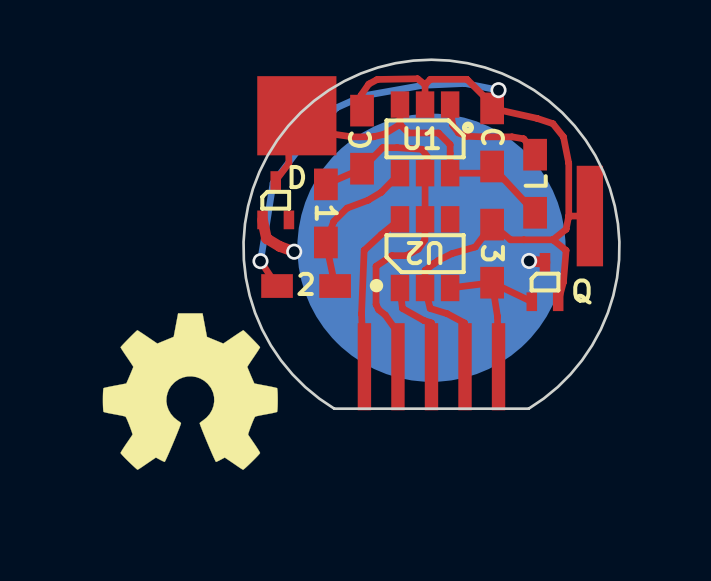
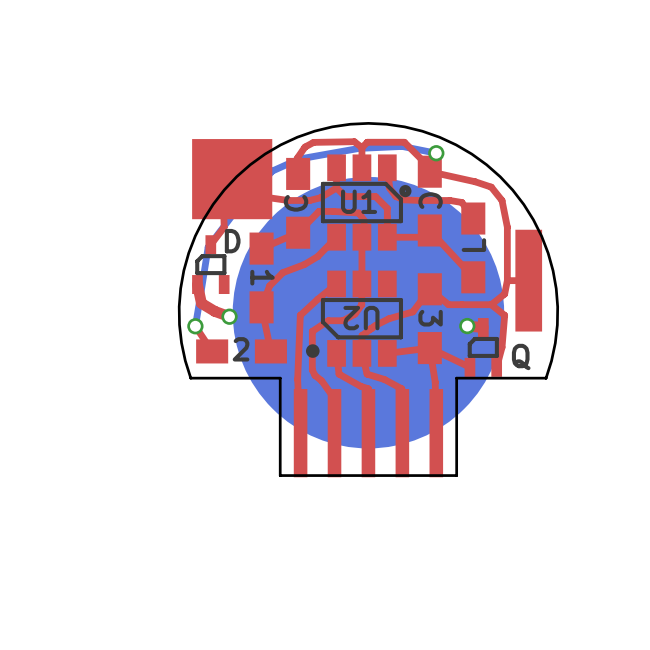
drawing: [102, 313, 278, 470] -> none
board edge: (518, 408) (528, 408) -> (456, 475) (456, 378) (546, 378)
board edge: (528, 408) (543, 398) (570, 374) (592, 345) (607, 312) (617, 277) (619, 259) (619, 241) (614, 205) (603, 171) (595, 155) (574, 125) (548, 100) (518, 81) (484, 67) (467, 63) (431, 59) (395, 63) (377, 67) (344, 81) (314, 100) (288, 125) (277, 140) (259, 171) (248, 206) (243, 241) (245, 277) (249, 295) (262, 329) (280, 360) (305, 387) (334, 408) (344, 408) -> (546, 378) (555, 343) (557, 325) (556, 288) (553, 270) (548, 253) (533, 219) (512, 190) (500, 176) (486, 164) (456, 144) (422, 131) (404, 126) (386, 124) (350, 124) (314, 131) (297, 137) (280, 144) (250, 164) (224, 189) (213, 204) (203, 219) (188, 253) (183, 270) (179, 306) (181, 342) (190, 378) (280, 378) (280, 475)

